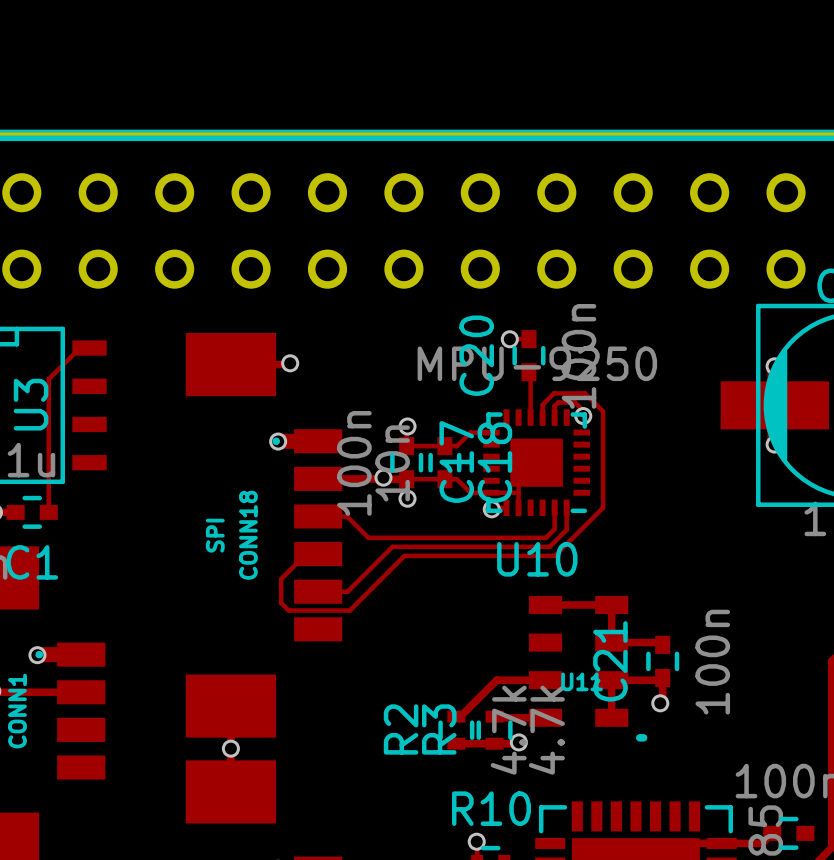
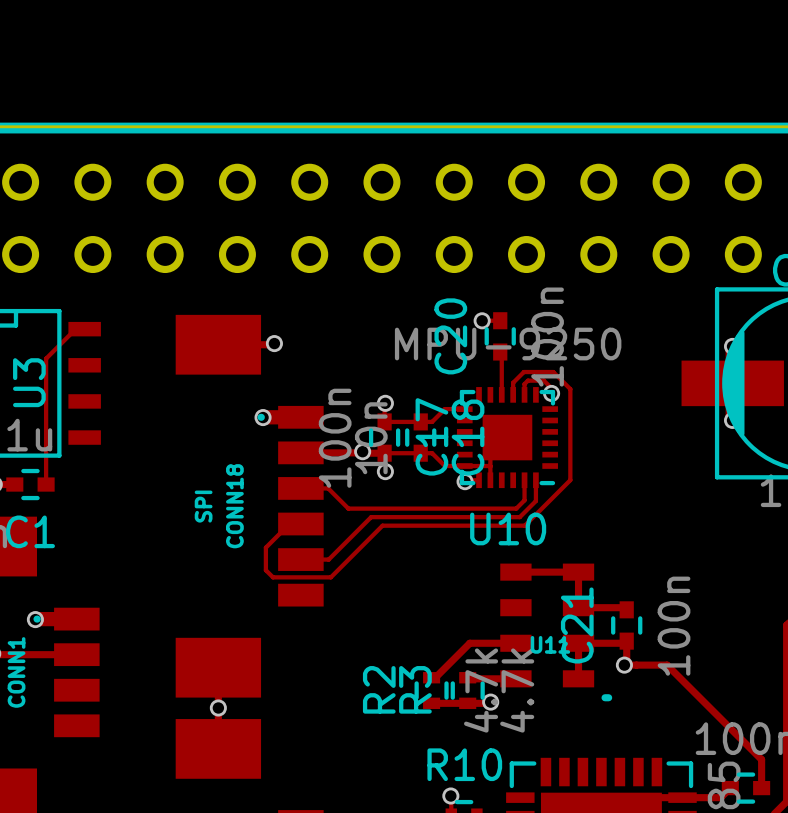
track: none -> (624, 665) (667, 665) (761, 759) (761, 788)

